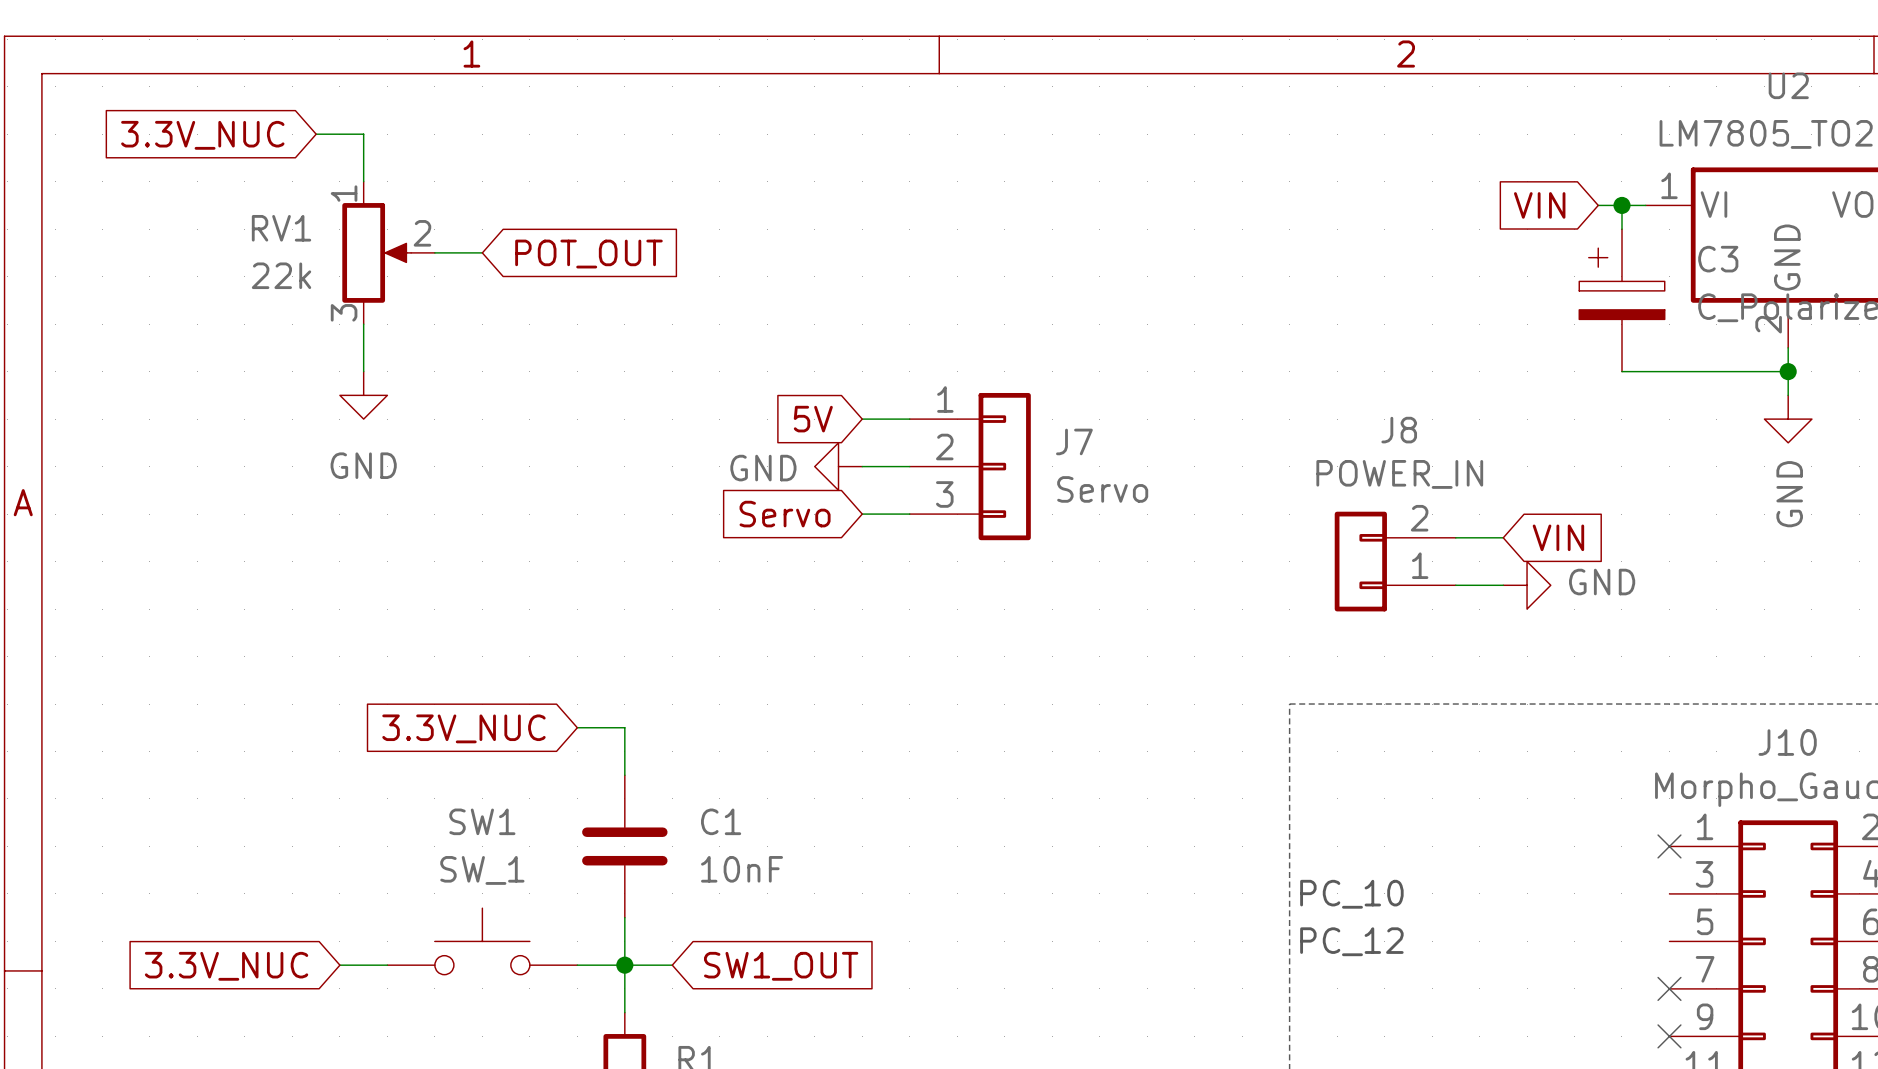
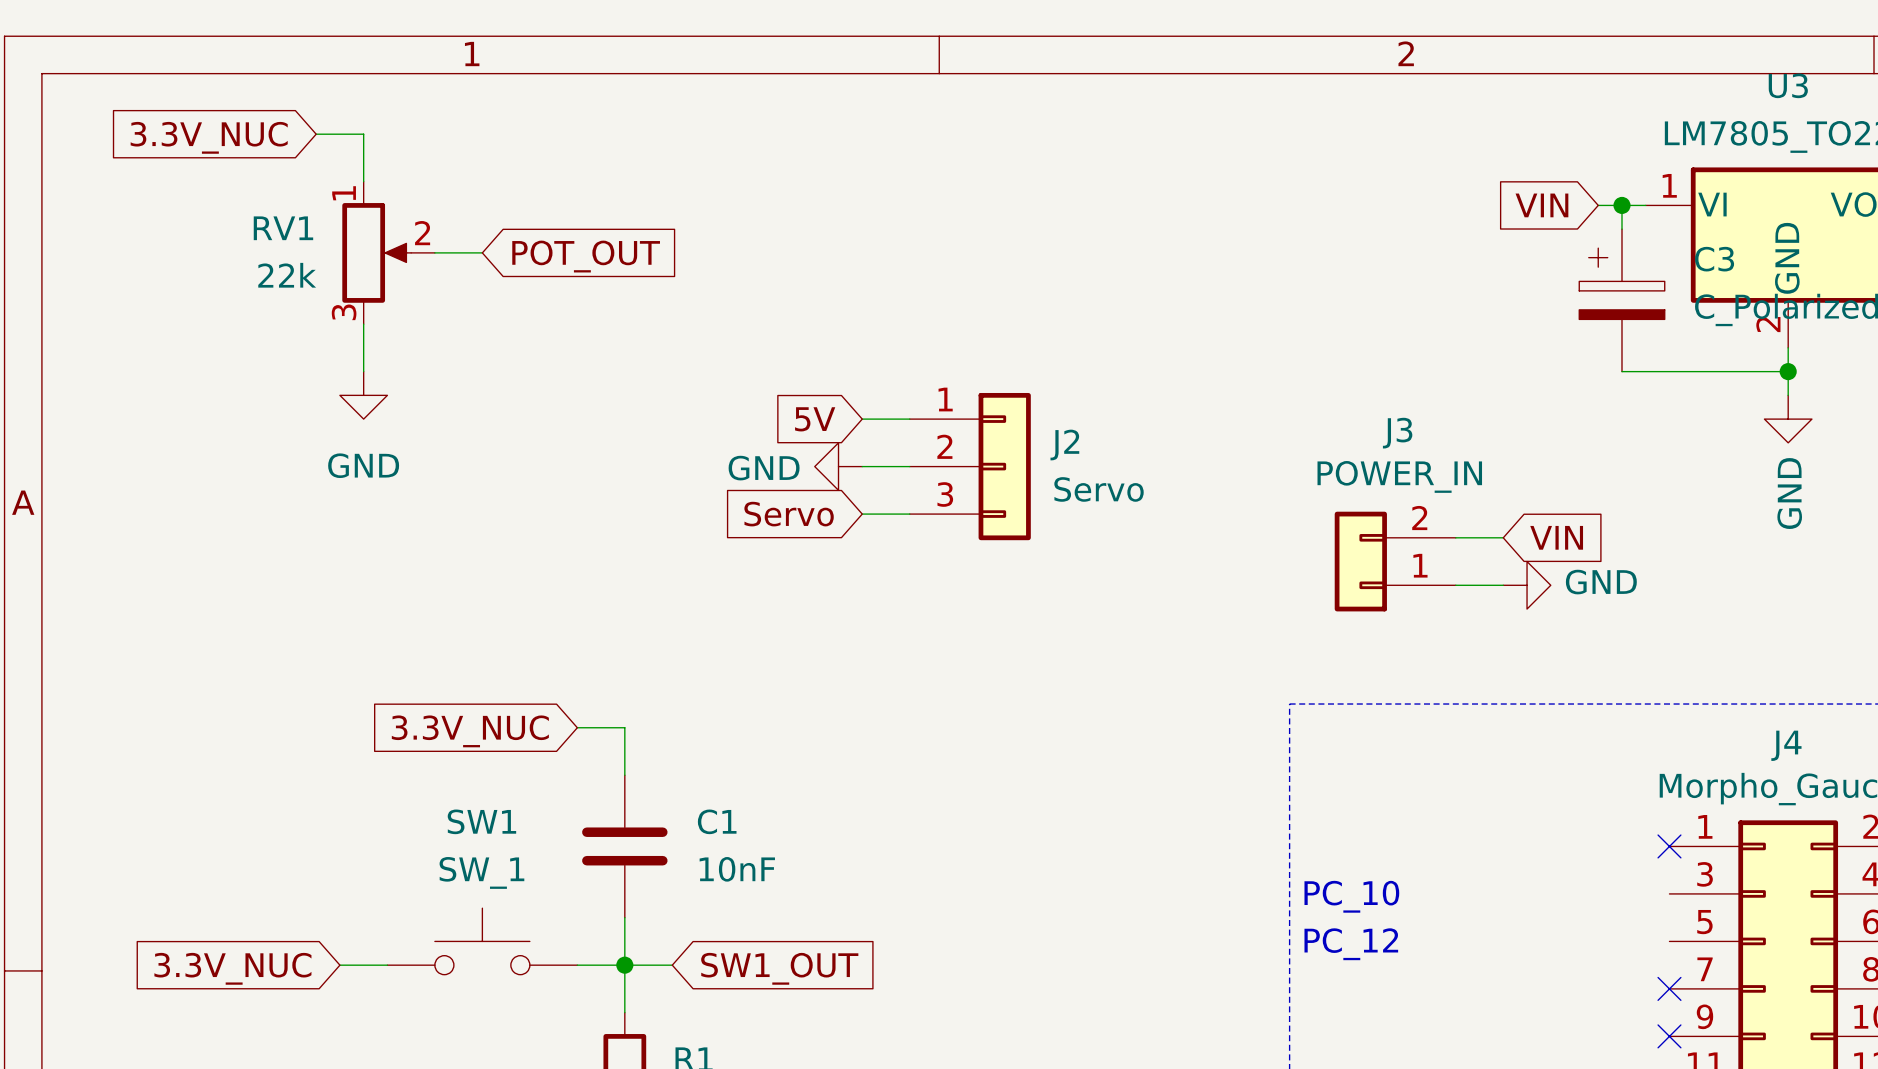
U2 name: U2 (1788, 85) -> U3 (1788, 85)
J8 name: J8 (1399, 430) -> J3 (1397, 433)
J7 name: J7 (1074, 441) -> J2 (1064, 445)
J10 name: J10 (1787, 742) -> J4 (1786, 745)

